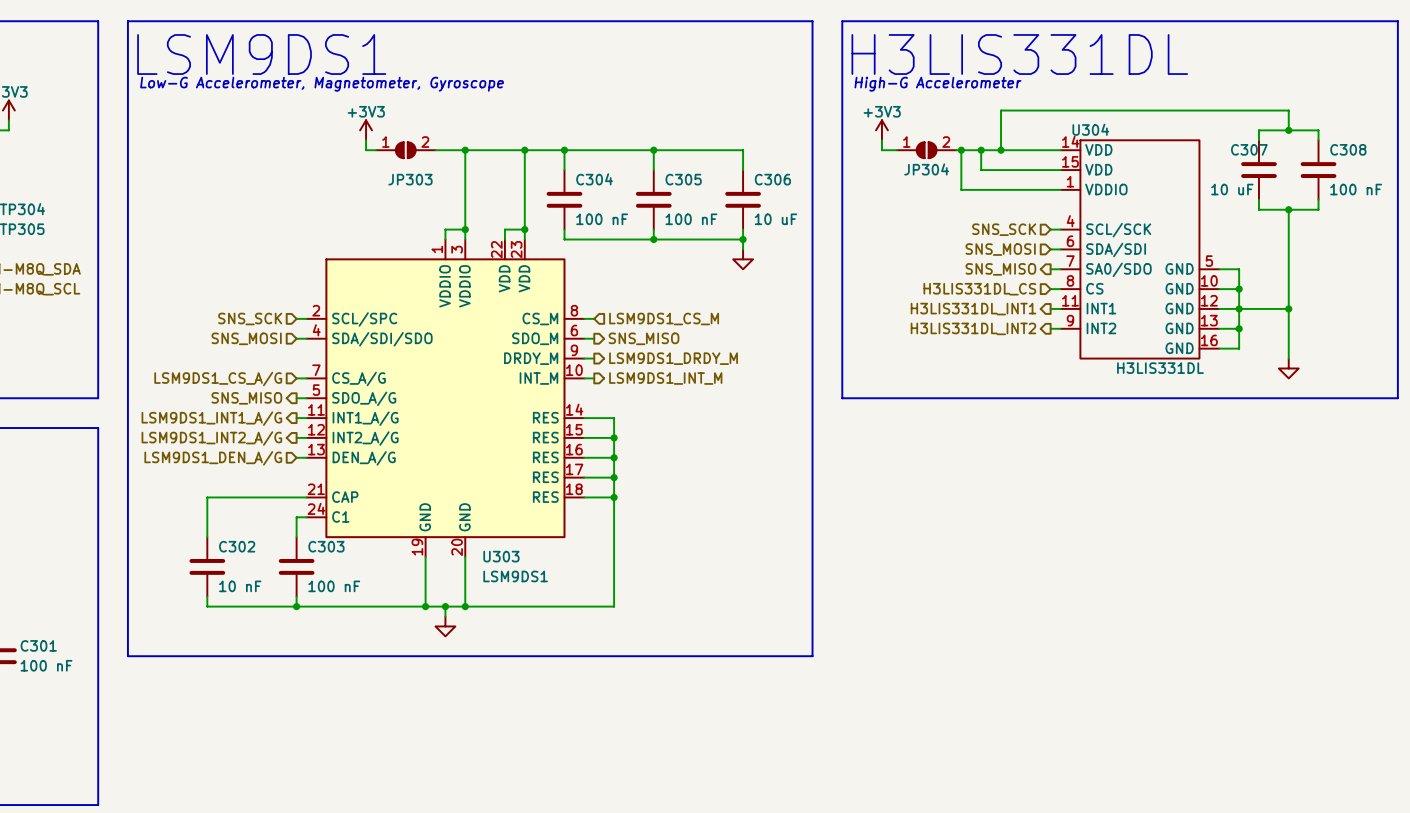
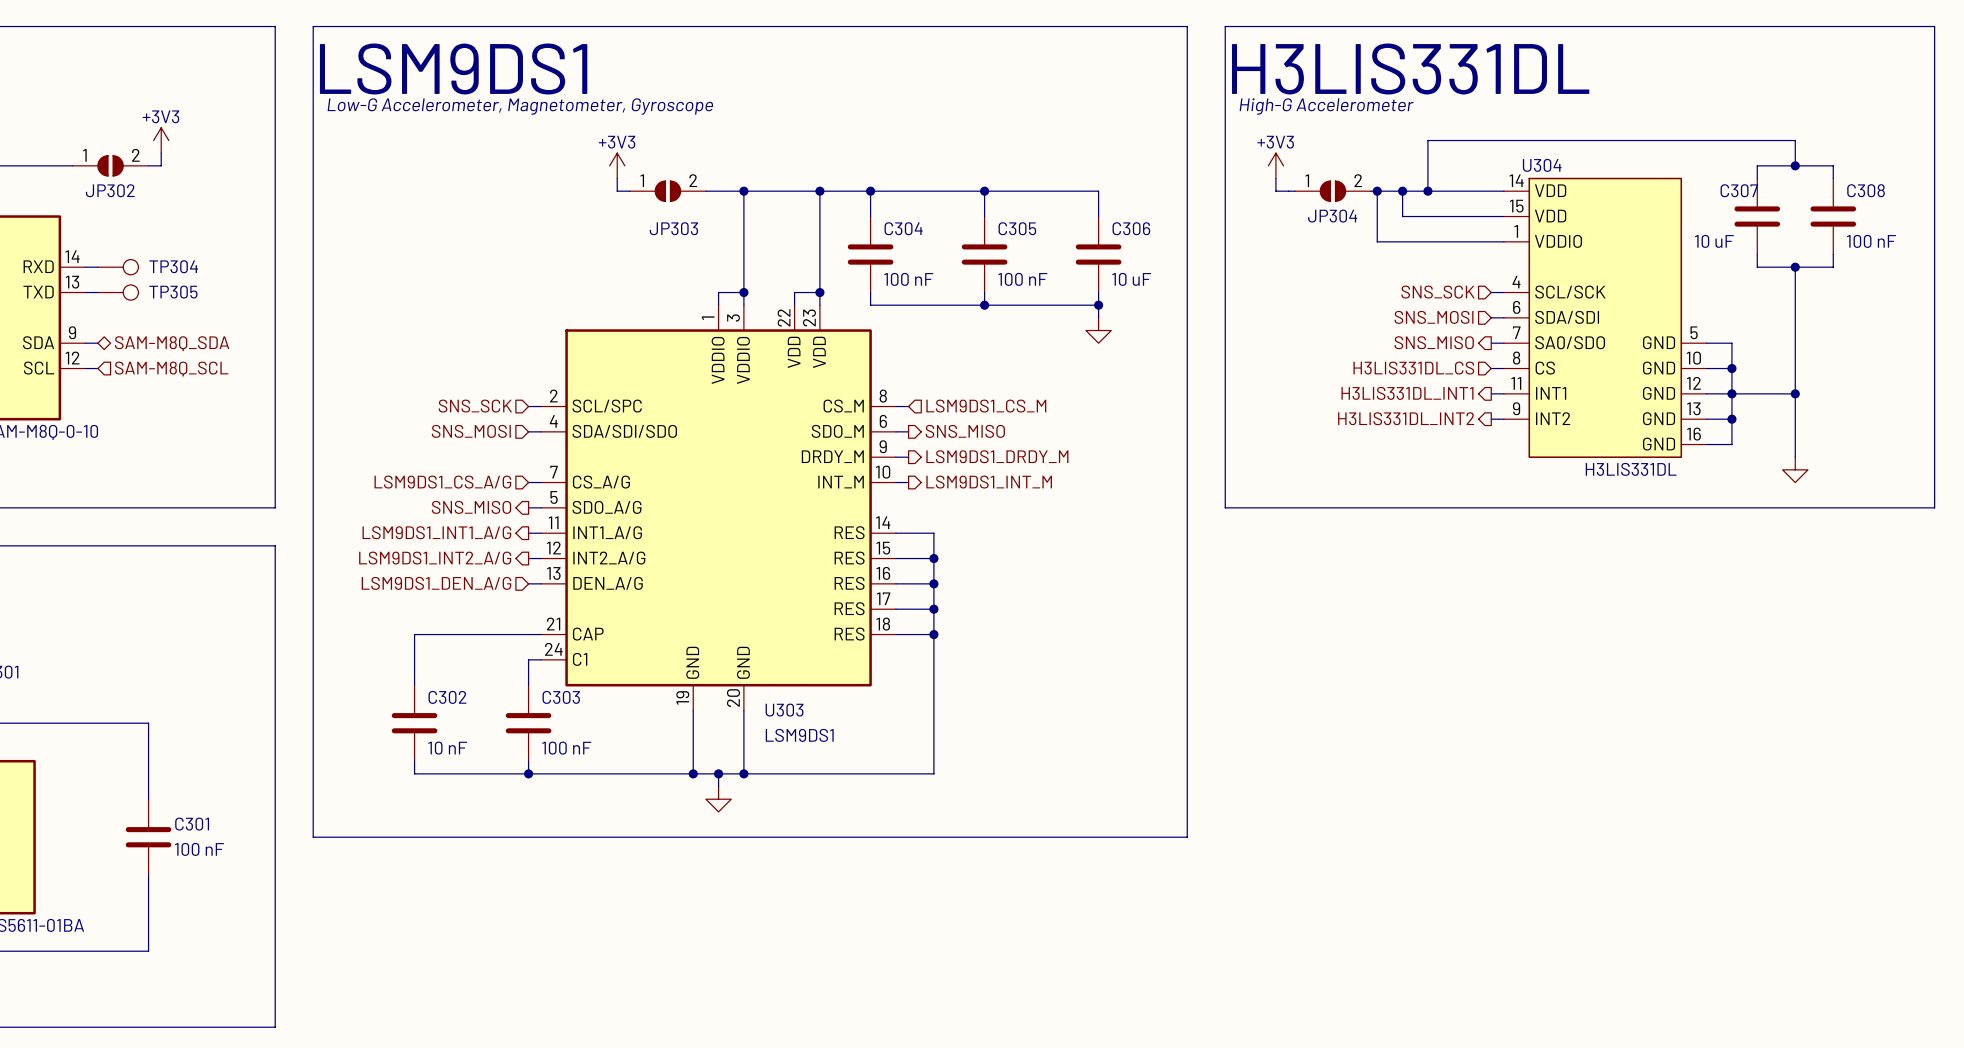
U304 symbol: [1060, 139, 1220, 360] -> [1503, 177, 1707, 458]

